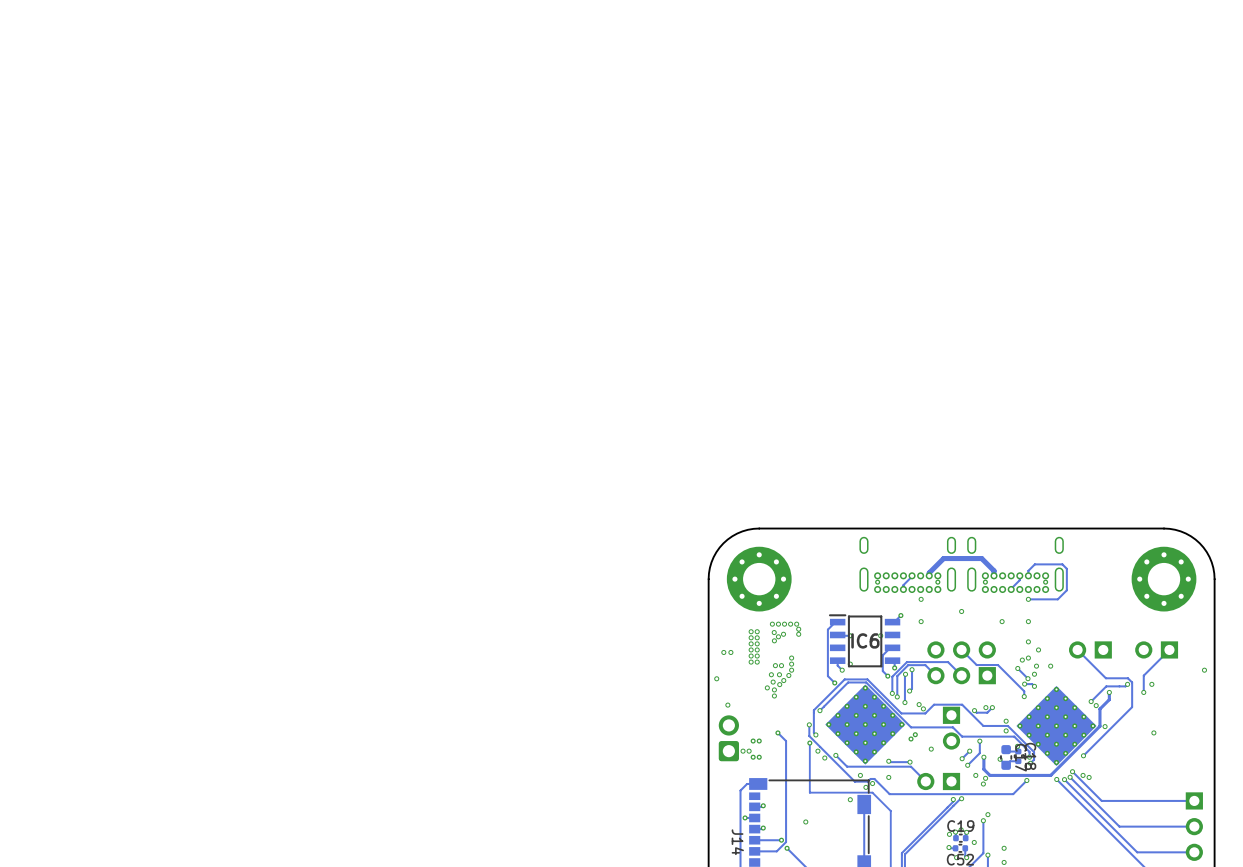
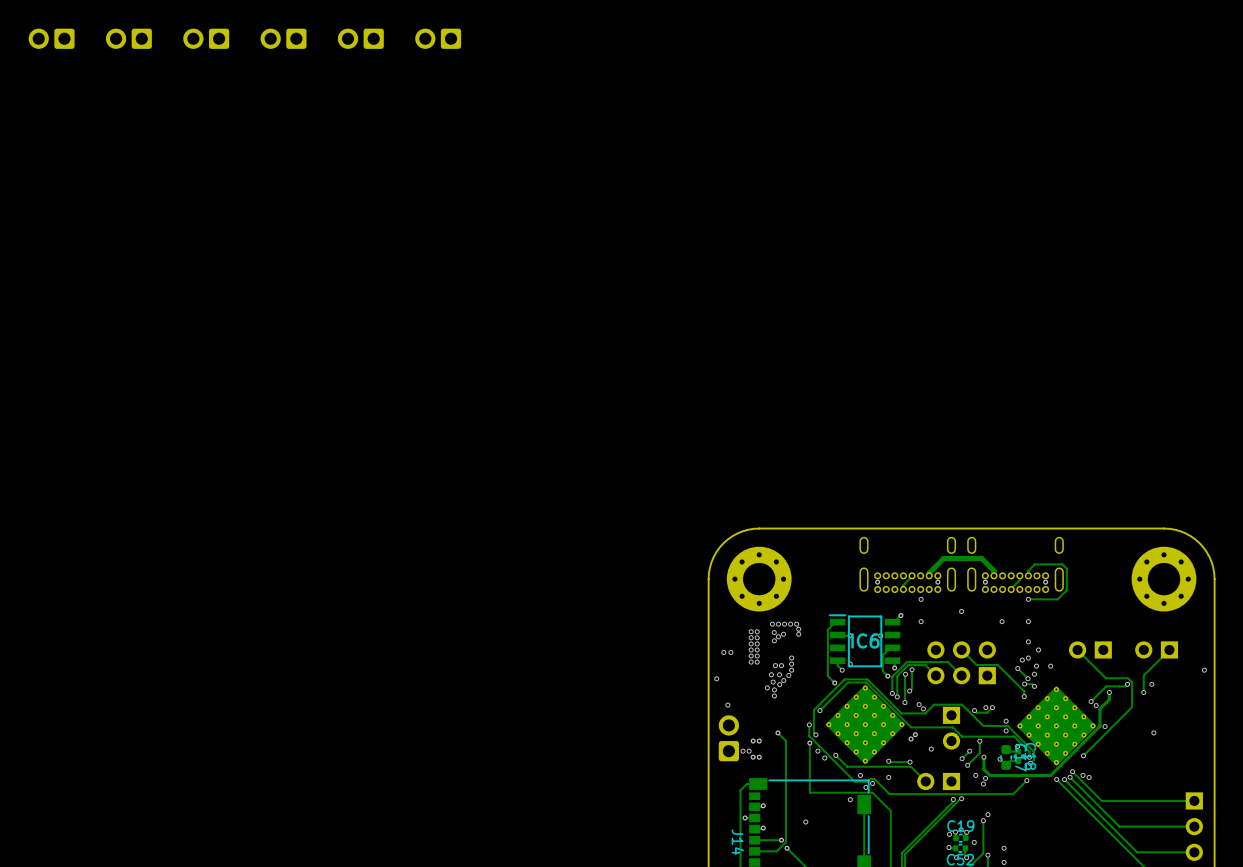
part: none -> (51, 38)
part: none -> (128, 38)
part: none -> (206, 38)
part: none -> (283, 38)
part: none -> (360, 38)
part: none -> (438, 38)

